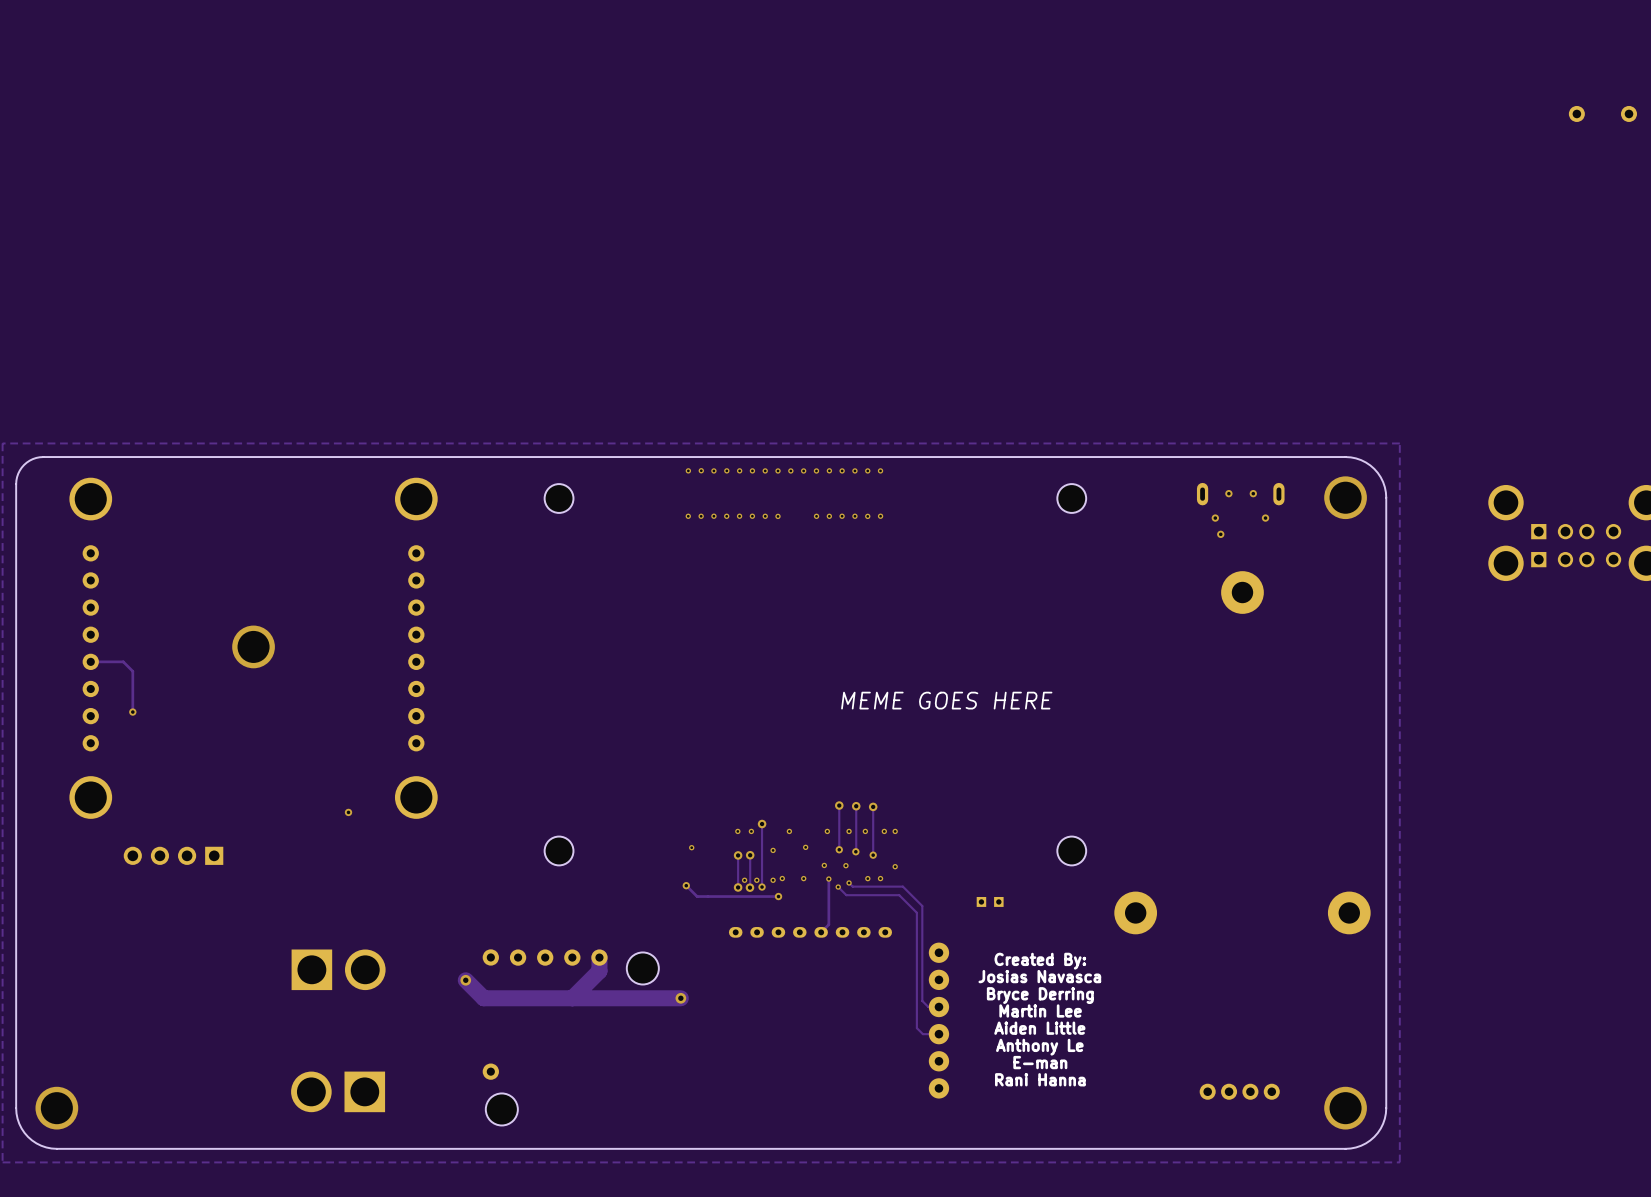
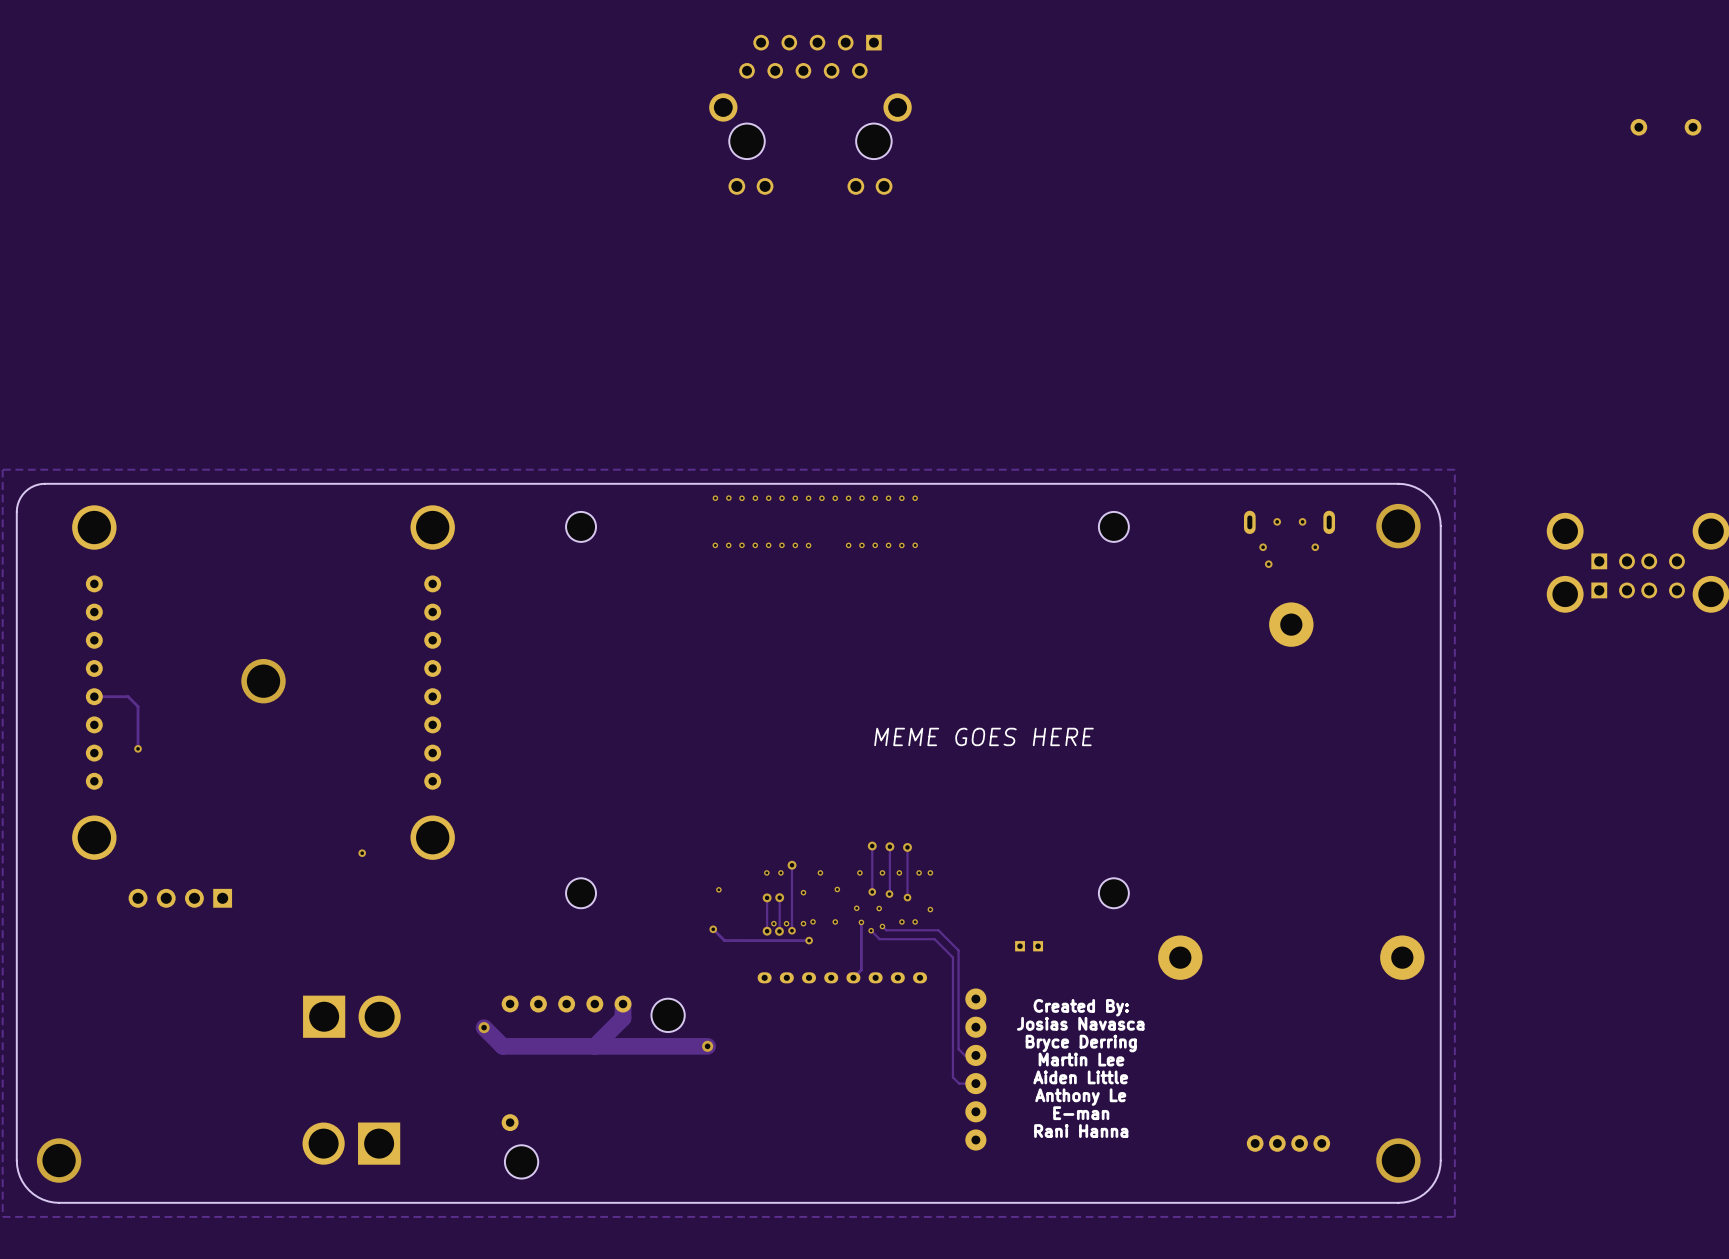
part: none -> (810, 114)

